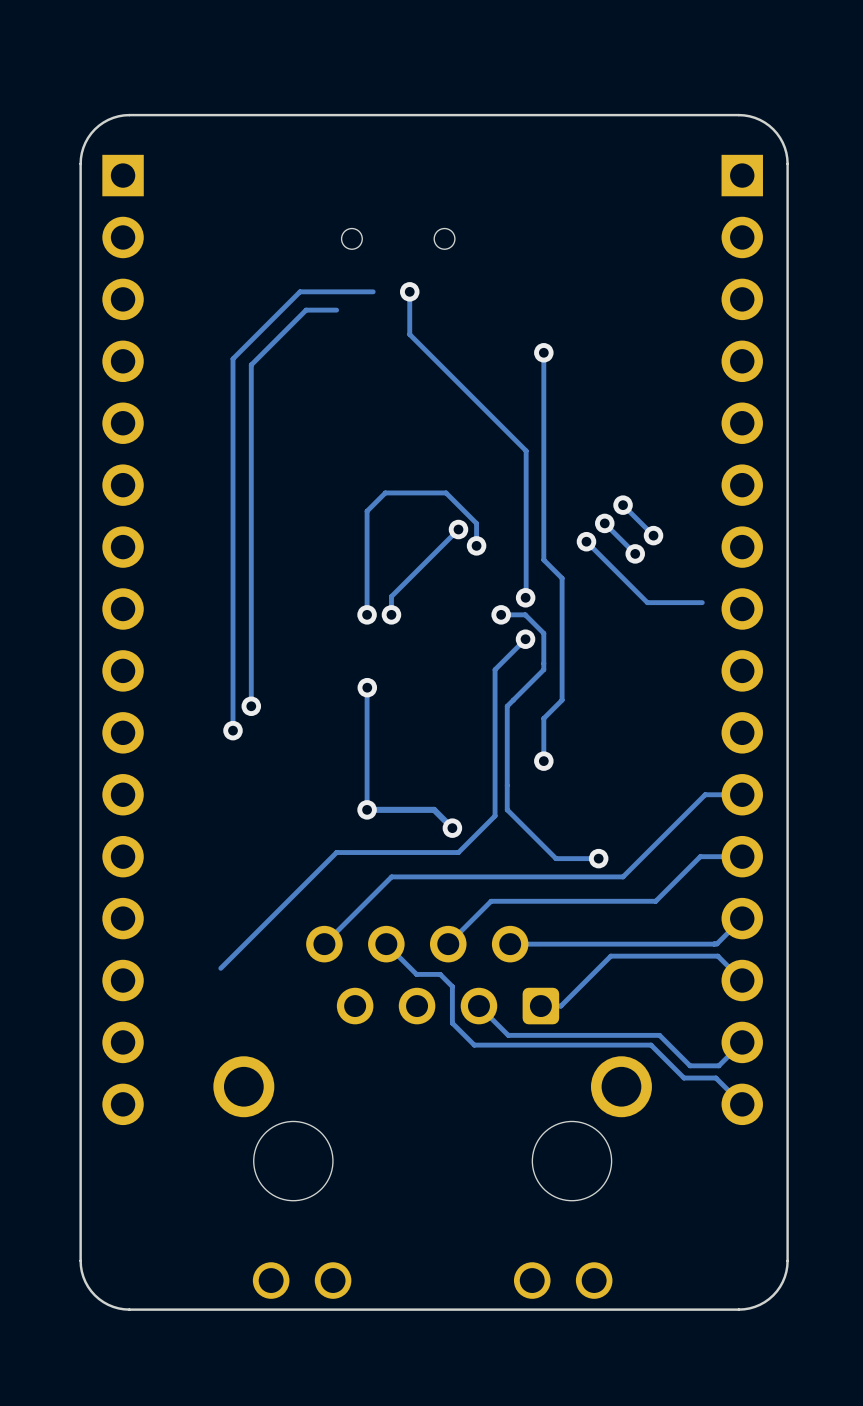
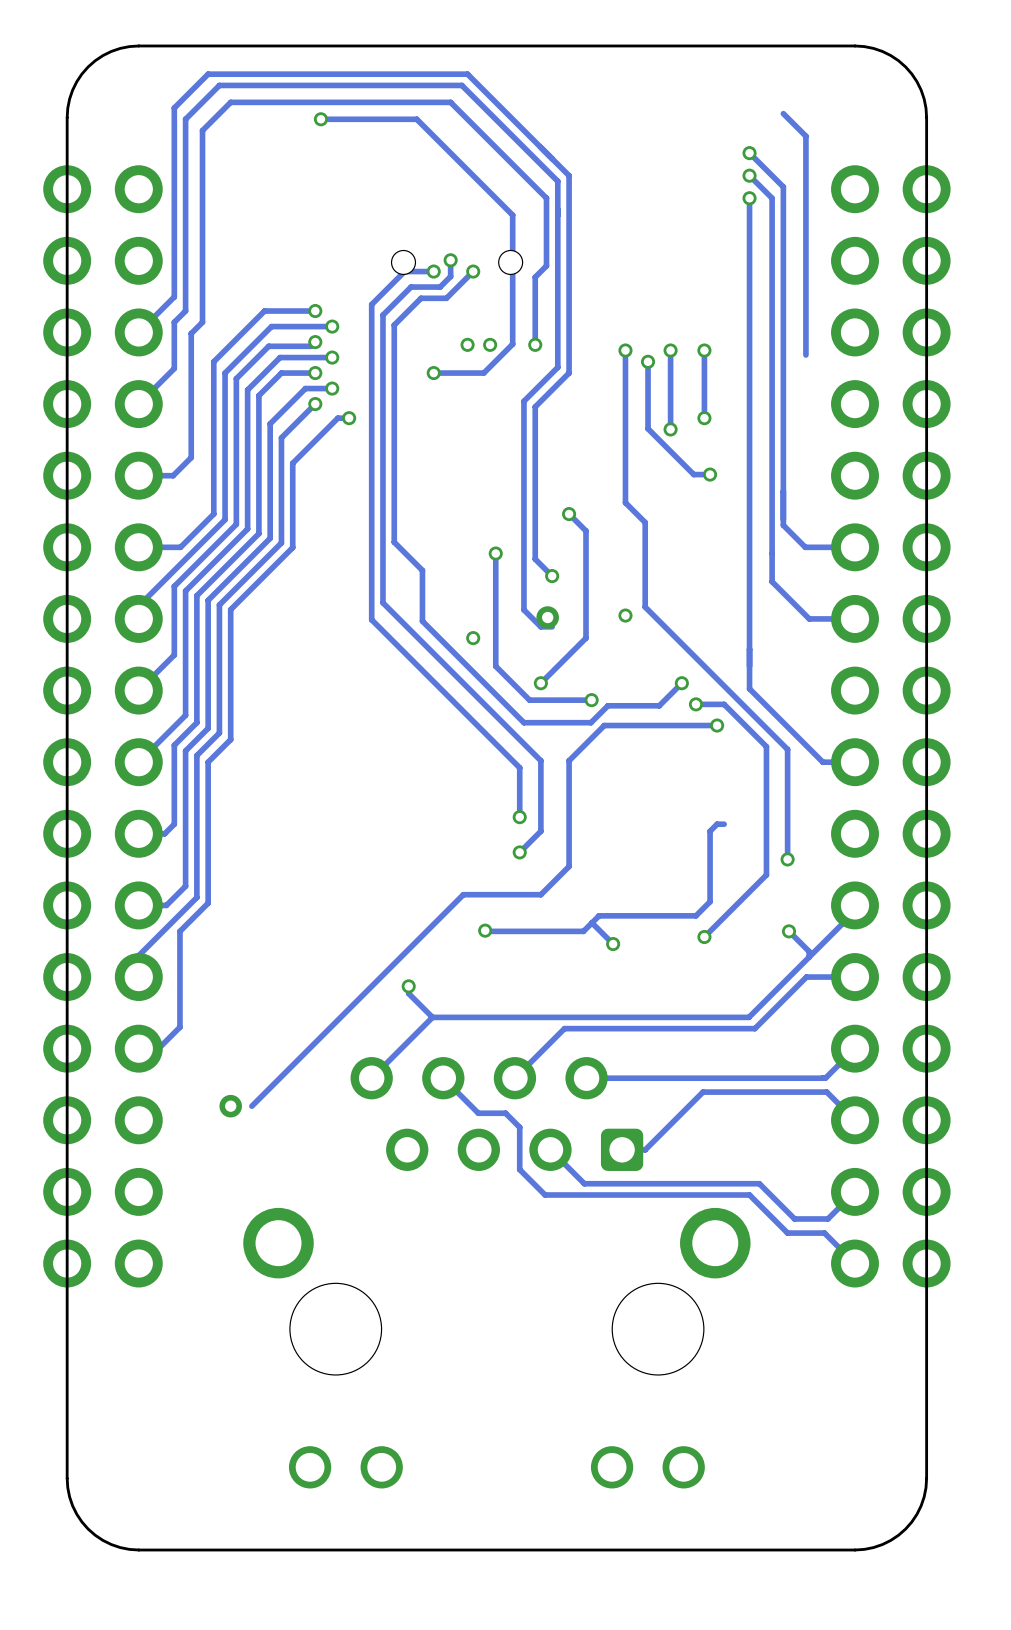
track: none -> (783, 113) (805, 136) (805, 355)
track: none -> (320, 119) (416, 119) (512, 215) (512, 344) (483, 373) (433, 373)
via: none -> (320, 119)
board edge: (738, 115) (129, 115) (118, 116) (103, 122) (94, 129) (85, 142) (80, 163) (80, 1260) (83, 1276) (88, 1286) (94, 1295) (108, 1304) (129, 1309) (738, 1309) (749, 1308) (764, 1302) (776, 1291) (782, 1282) (787, 1260) (787, 163) (782, 142) (773, 129) (760, 119) (738, 115) -> (855, 45) (882, 51) (905, 66) (921, 90) (926, 117) (926, 1478) (924, 1496) (917, 1514) (905, 1529) (890, 1540) (873, 1547) (855, 1550) (138, 1550) (120, 1547) (102, 1540) (88, 1529) (76, 1514) (69, 1496) (67, 1478) (67, 117) (69, 99) (76, 81) (88, 66) (102, 55) (120, 48) (138, 45) (855, 45)
track: none -> (749, 153) (783, 186) (783, 525) (805, 547) (855, 547)
via: none -> (749, 153)
track: none -> (749, 175) (772, 198) (772, 581) (809, 618) (855, 618)
via: none -> (749, 175)
track: none -> (749, 198) (749, 688) (822, 762) (855, 762)
via: none -> (749, 198)
track: none -> (450, 260) (450, 276) (440, 287) (411, 287) (382, 315) (382, 602) (540, 760) (540, 831) (519, 852)
via: none -> (450, 260)
track: none -> (433, 271) (404, 271) (371, 304) (371, 619) (519, 767) (519, 817)
via: none -> (433, 271)
track: none -> (473, 271) (446, 298) (421, 298) (394, 325) (394, 542) (422, 570) (422, 621) (523, 722) (590, 722) (607, 705) (659, 705) (681, 683)
via: none -> (473, 271)
track: none -> (315, 311) (264, 311) (213, 361) (213, 514) (180, 547) (138, 547)
via: none -> (315, 311)
track: (373, 291) (300, 291) (233, 358) (233, 730) -> none
track: (409, 291) (409, 334) (526, 450) (525, 597) -> none
via: (409, 291) -> none
track: none -> (332, 326) (271, 326) (225, 373) (225, 519) (138, 605) (138, 618)
via: none -> (332, 326)
track: none -> (138, 332) (174, 296) (174, 108) (208, 74) (467, 74) (569, 175) (569, 373) (535, 406) (535, 559) (552, 576)
track: none -> (315, 342) (311, 346) (268, 346) (236, 378) (236, 524) (174, 586) (174, 655) (138, 690)
via: none -> (315, 342)
track: (336, 310) (306, 310) (251, 364) (251, 706) -> none
via: none -> (467, 344)
via: none -> (490, 344)
track: none -> (535, 344) (535, 277) (546, 265) (546, 198) (450, 102) (230, 102) (202, 130) (202, 322) (191, 333) (191, 457) (173, 475) (138, 475)
via: none -> (535, 344)
track: none -> (625, 350) (625, 394)
via: none -> (625, 350)
track: none -> (670, 350) (670, 429)
via: none -> (670, 350)
track: none -> (704, 350) (704, 418)
via: none -> (704, 350)
track: none -> (332, 357) (280, 357) (247, 389) (247, 528) (185, 591) (185, 715) (138, 762)
via: none -> (332, 357)
track: none -> (648, 361) (648, 428) (693, 474) (710, 474)
via: none -> (648, 361)
track: none -> (315, 373) (281, 373) (258, 395) (258, 533) (196, 595) (196, 722) (174, 745) (174, 824) (164, 833) (138, 833)
via: none -> (315, 373)
via: none -> (433, 373)
track: none -> (332, 388) (305, 388) (270, 423) (270, 538) (208, 600) (208, 728) (185, 750) (185, 886) (166, 905) (138, 905)
via: none -> (332, 388)
via: (543, 352) -> none
track: none -> (138, 404) (174, 368) (174, 322) (185, 311) (185, 119) (219, 85) (461, 85) (557, 181) (557, 367) (523, 401) (523, 609) (540, 626) (552, 626)
track: none -> (315, 404) (281, 437) (281, 542) (219, 604) (219, 733) (196, 755) (196, 897) (138, 955) (138, 977)
via: none -> (315, 404)
track: none -> (349, 418) (337, 418) (292, 463) (292, 547) (230, 609) (230, 739) (208, 762) (208, 903) (179, 931) (179, 1027) (158, 1048) (138, 1048)
via: none -> (349, 418)
via: none -> (704, 418)
via: none -> (670, 429)
via: none -> (710, 474)
track: (543, 446) (543, 559) (562, 578) (562, 700) (543, 718) (543, 761) -> (625, 502) (645, 522) (645, 607) (787, 749) (787, 859)
track: none -> (569, 514) (585, 530) (585, 638) (540, 683)
via: none -> (569, 514)
track: none -> (495, 553) (495, 666) (529, 700) (591, 700)
via: none -> (495, 553)
track: (623, 505) (653, 535) -> none
via: (623, 505) -> none
via: none -> (552, 576)
track: (604, 523) (635, 553) -> none
via: (604, 523) -> none
track: (458, 529) (391, 596) (391, 614) -> none
via: (458, 529) -> none
via: (653, 535) -> none
track: (586, 541) (647, 602) (702, 602) -> none
via: (586, 541) -> none
via: none -> (625, 615)
track: (476, 545) (476, 523) (446, 492) (385, 492) (367, 511) (367, 614) -> none
via: (635, 553) -> none
via: none -> (473, 638)
via: (525, 597) -> none
via: none -> (540, 683)
via: none -> (681, 683)
via size: [491, 605, 511, 625] -> [584, 693, 599, 708]
via: (367, 614) -> none
via: (391, 614) -> none
track: (501, 614) (525, 614) (543, 633) (543, 669) (507, 706) (507, 809) (556, 858) (598, 858) -> none
track: none -> (695, 704) (724, 704) (766, 746) (766, 874) (704, 937)
via: none -> (695, 704)
part: none -> (102, 726)
part: (123, 639) -> none
via: (525, 639) -> none
track: none -> (717, 725) (604, 725)
via: none -> (717, 725)
part: (742, 639) -> none
part: none -> (890, 726)
track: (367, 687) (367, 809) (434, 809) (452, 828) -> none
via: (367, 687) -> none
via: (251, 706) -> none
via: none -> (519, 817)
track: none -> (724, 824) (717, 824) (710, 831) (710, 901) (695, 915) (599, 915) (583, 931) (485, 930)
via: (233, 730) -> none
via: none -> (519, 852)
via: none -> (787, 859)
track: (495, 761) (495, 815) (458, 852) (336, 852) -> (569, 866) (540, 894) (463, 894) (385, 972)
via: (543, 761) -> none
track: (742, 794) (705, 794) (623, 876) (391, 876) (377, 891) -> (855, 905) (855, 911) (748, 1017) (432, 1017) (408, 993) (408, 986)
via: (367, 809) -> none
track: none -> (591, 922) (613, 944)
via: none -> (485, 930)
track: none -> (789, 931) (809, 951) (809, 957)
via: none -> (789, 931)
via: none -> (704, 937)
via: (452, 828) -> none
via: none -> (613, 944)
via: (598, 858) -> none
via: none -> (408, 986)
via: none -> (230, 1106)

